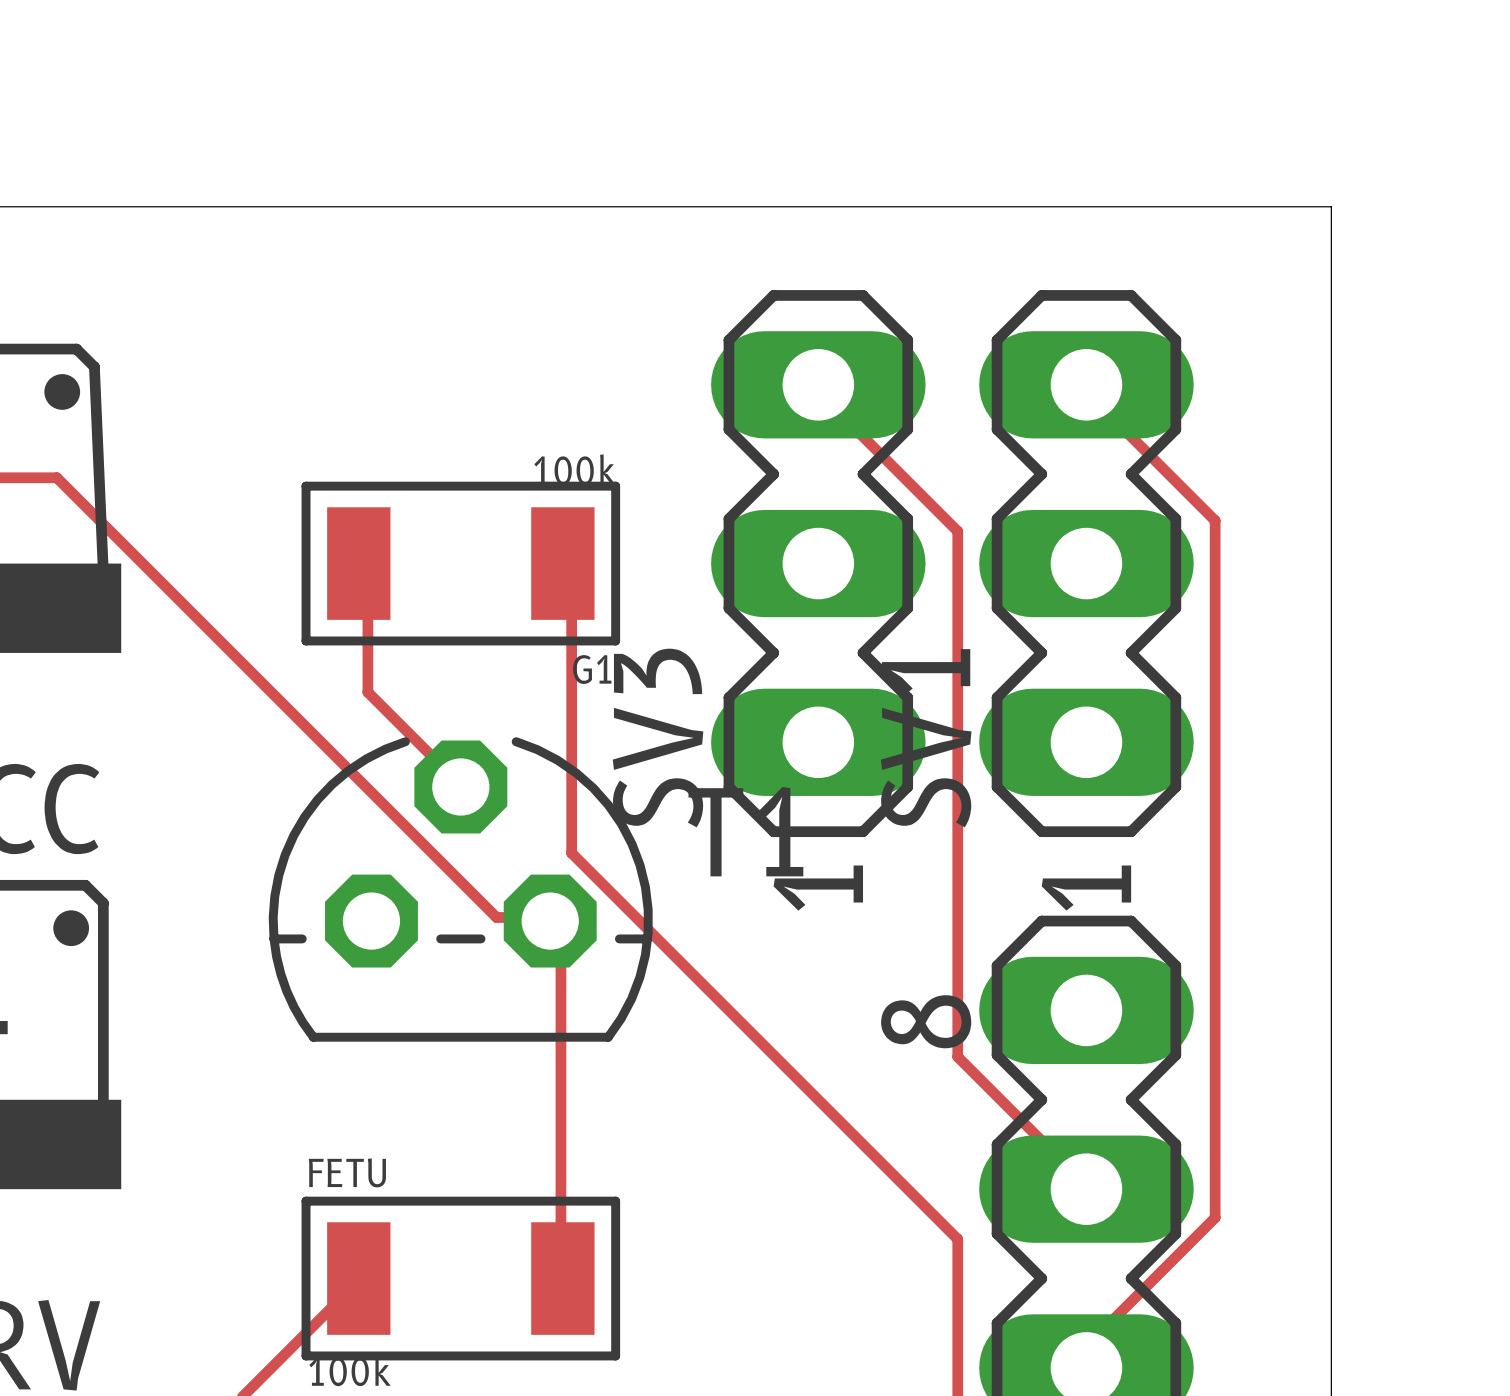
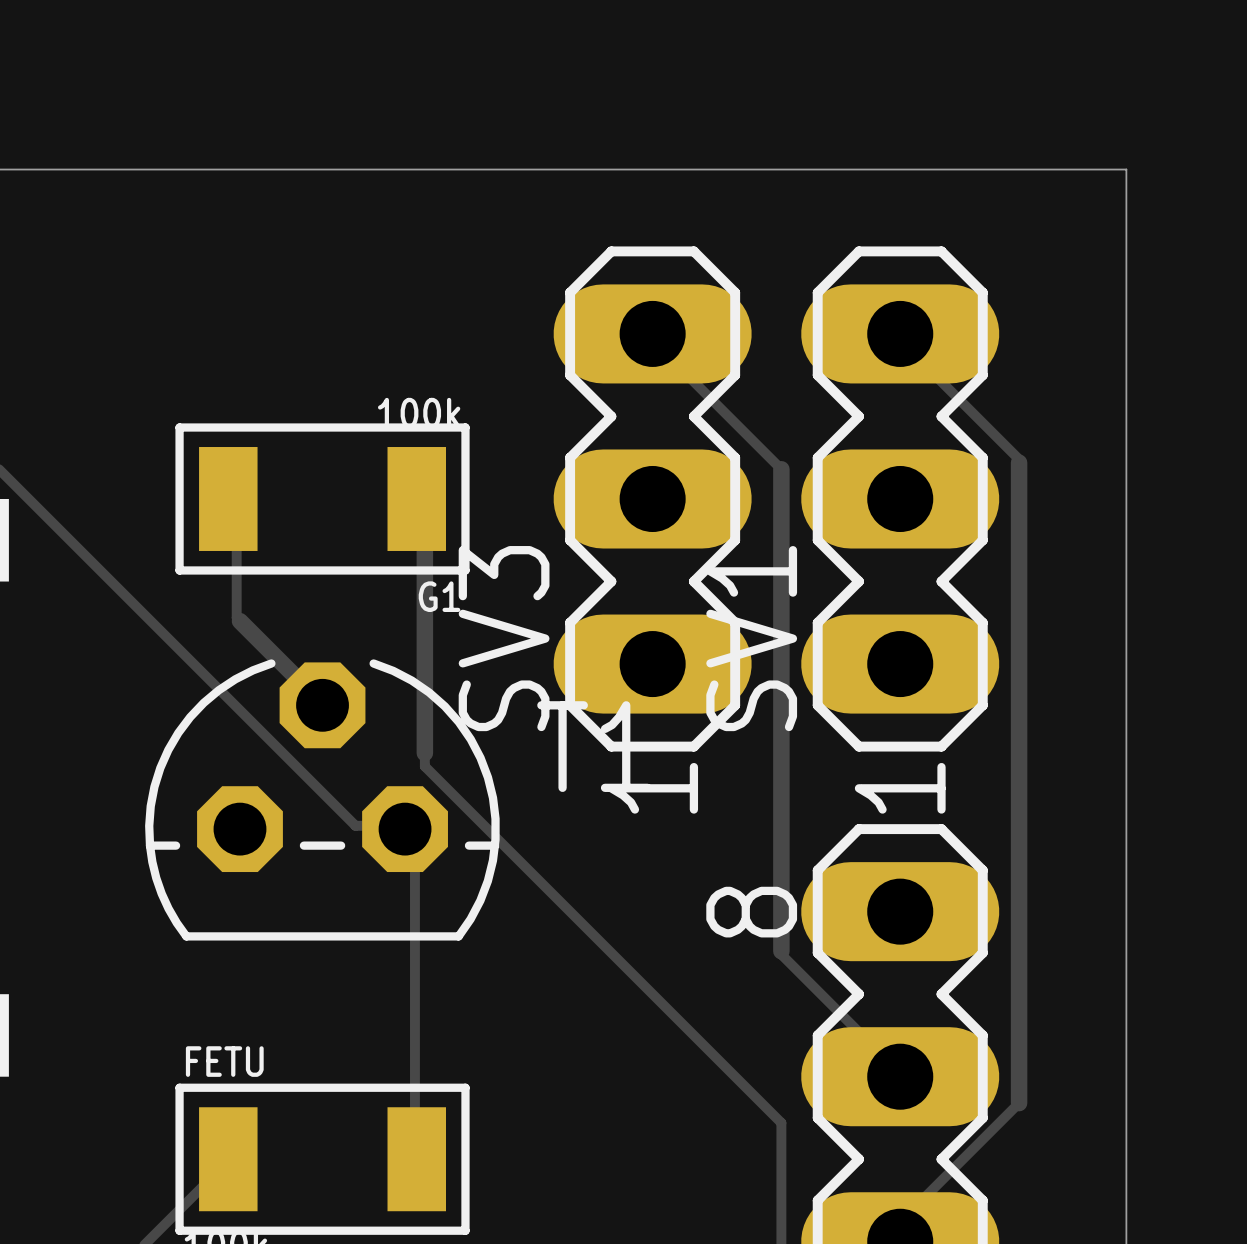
track width: thin (1215, 524) (1215, 1217) -> thick (1019, 462) (1019, 1103)
track width: thin (957, 531) (957, 1053) -> thick (781, 469) (781, 951)
track width: thin (571, 567) (571, 838) -> thick (424, 502) (424, 753)
track width: thin (371, 695) (453, 778) -> thick (239, 621) (315, 697)

